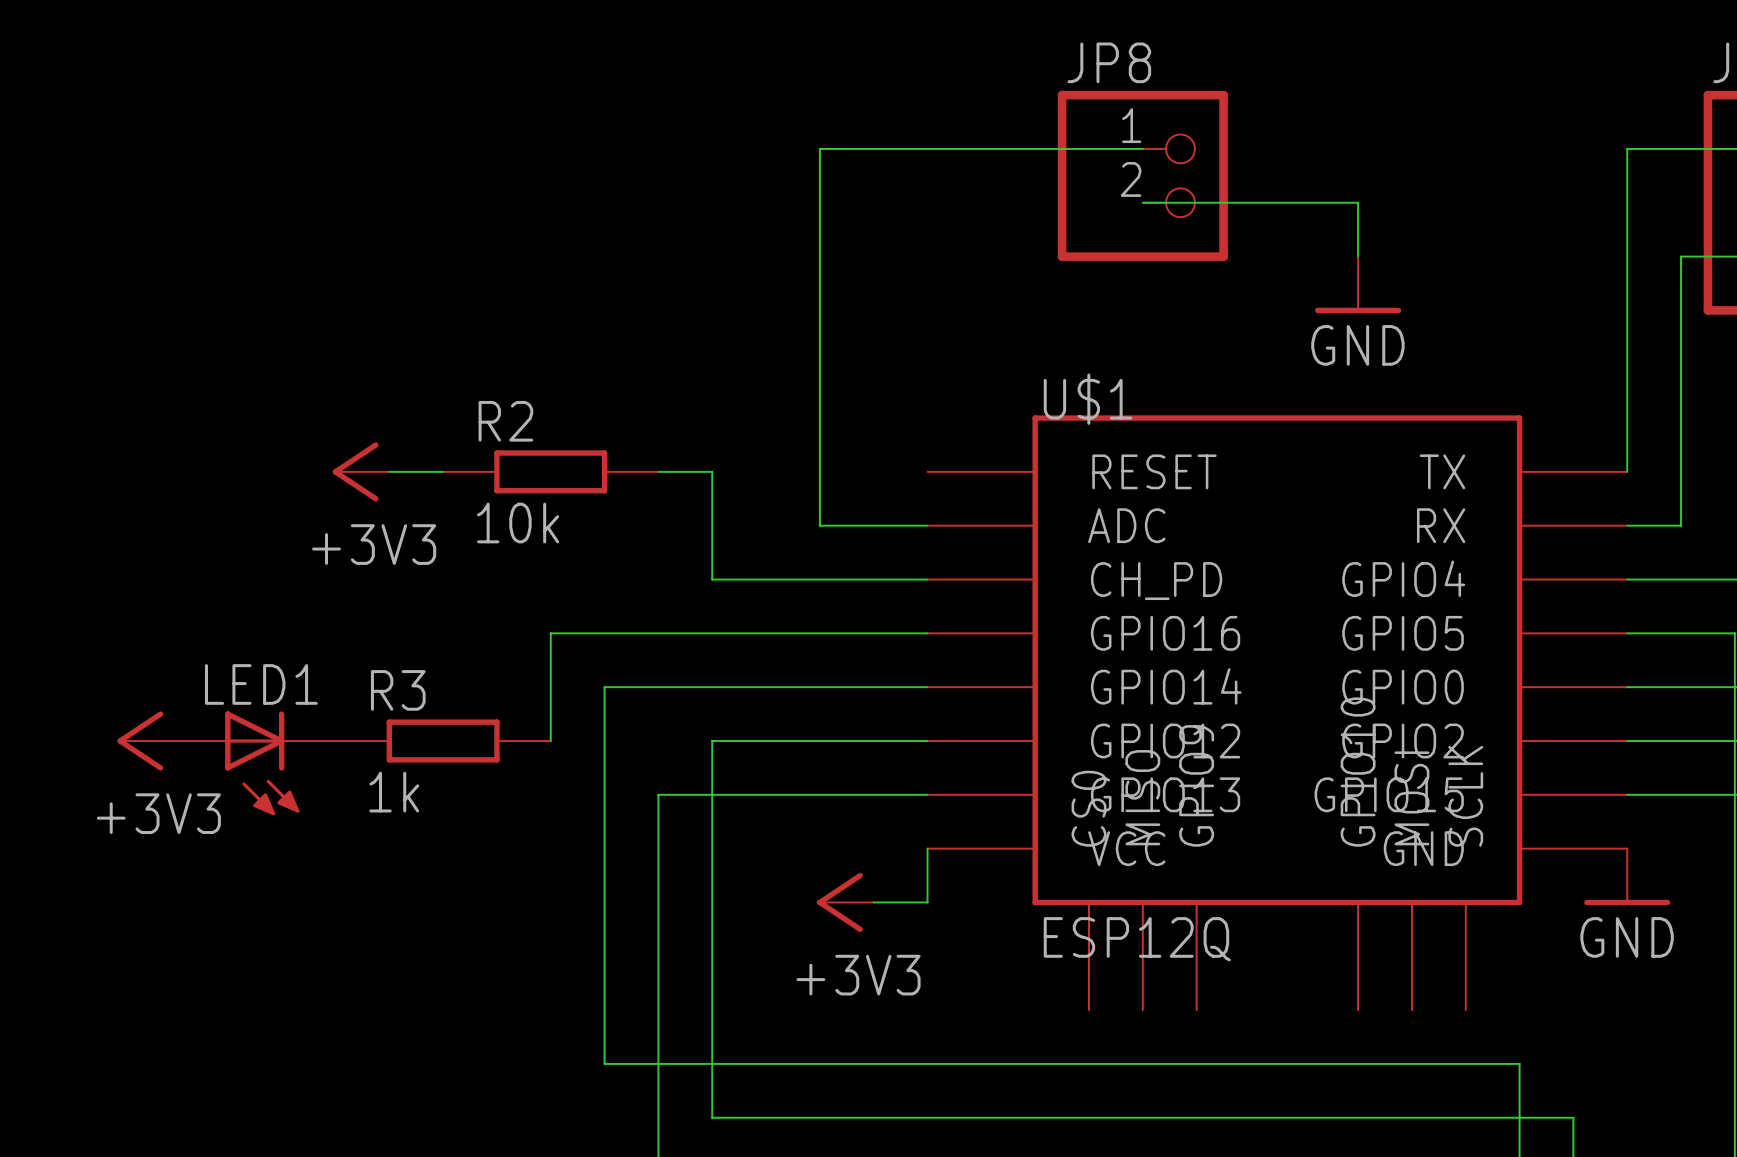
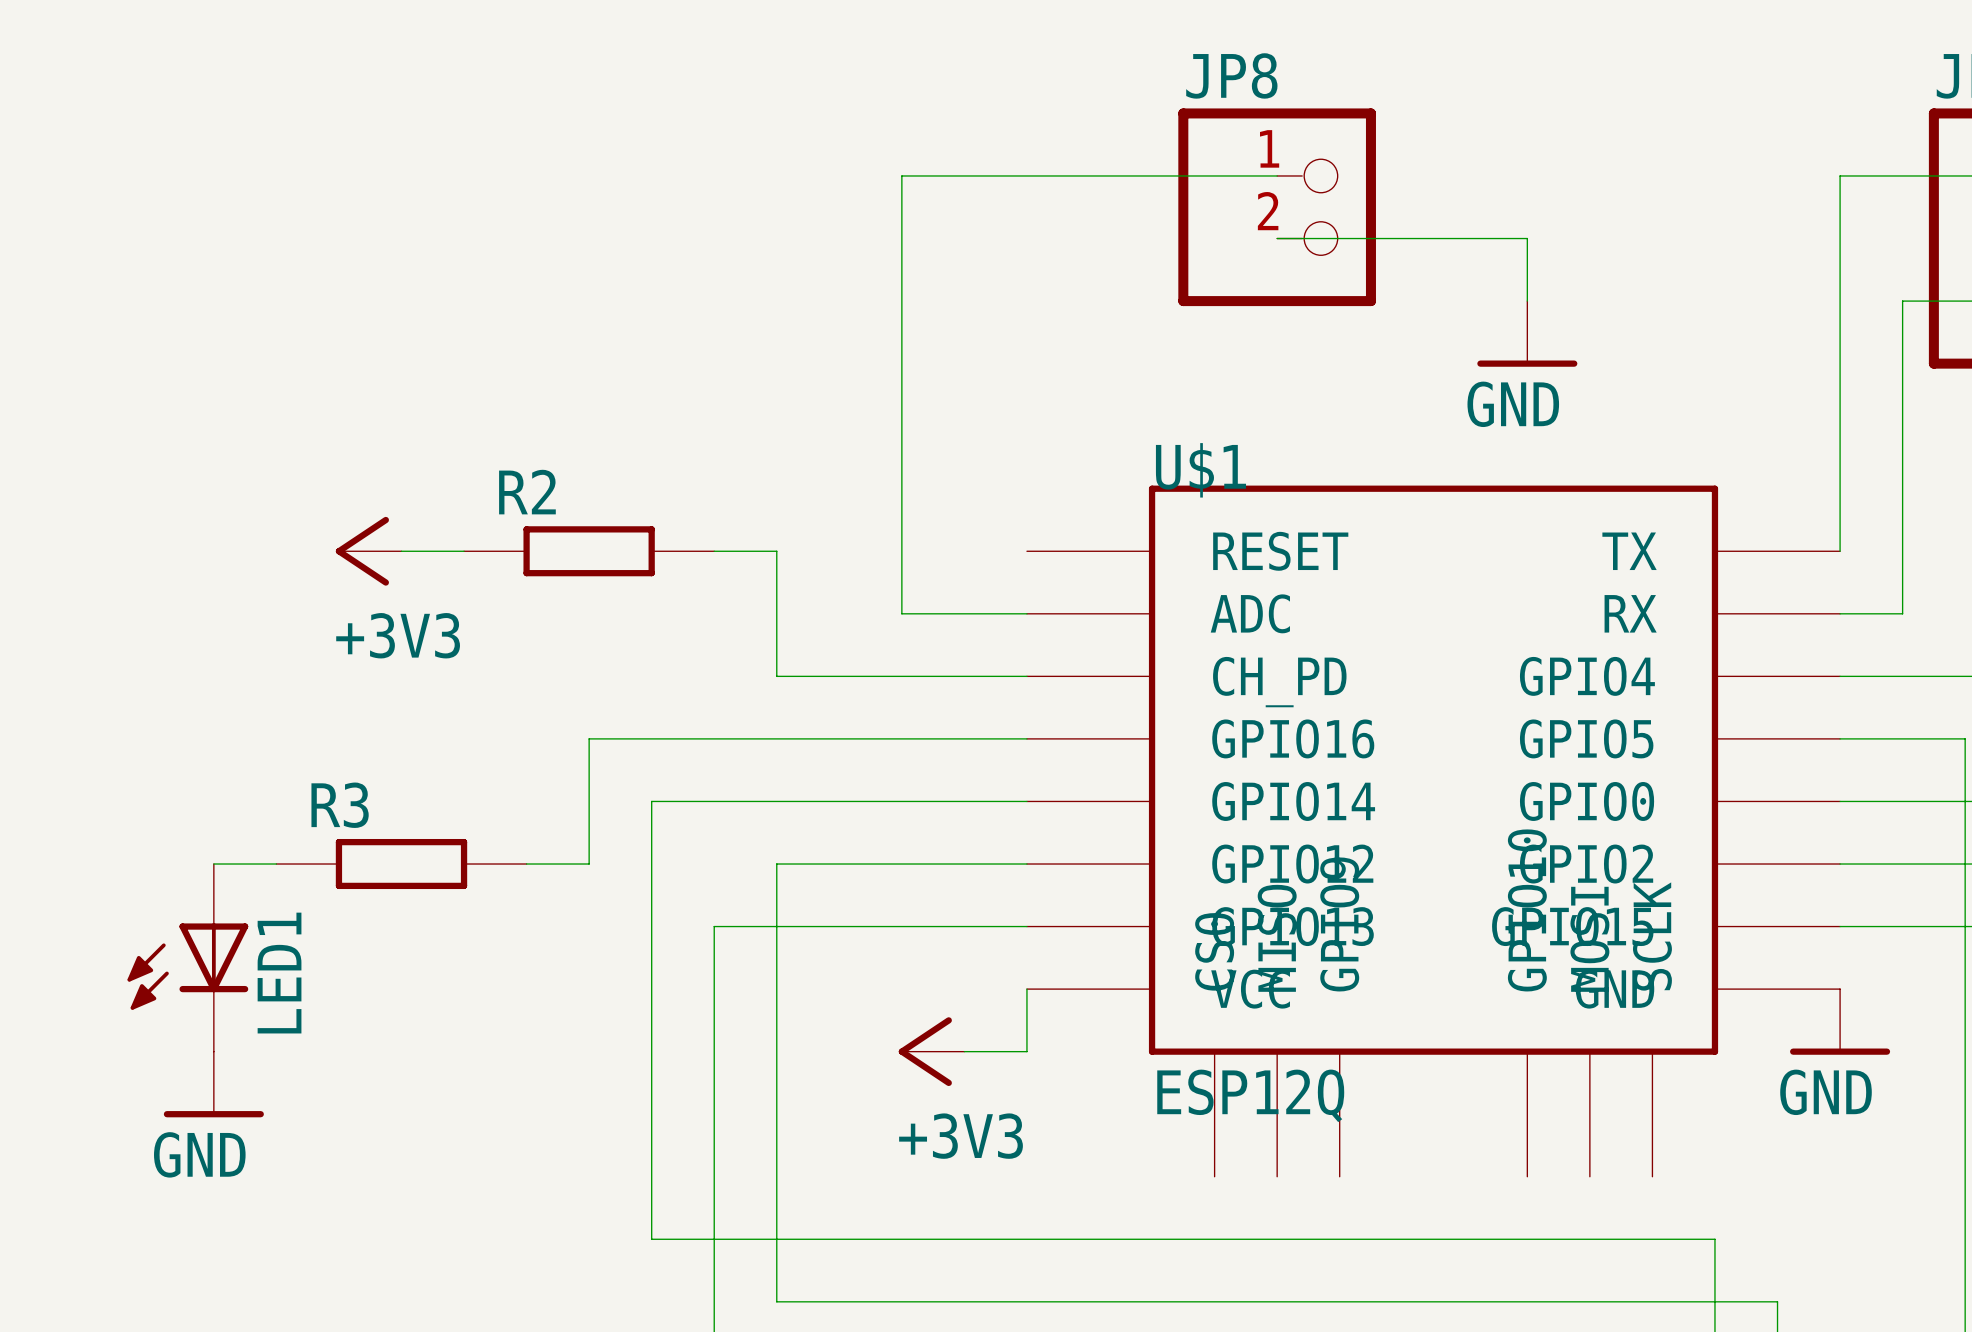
R2 value: 10k (518, 523) -> none
power symbol: +3V3 (145, 740) -> none
R3 position: (443, 740) -> (401, 864)
LED1 rotation: 0° (262, 763) -> 90° clockwise (187, 966)
R3 value: 1k (394, 792) -> none
power symbol: none -> GND (213, 1084)

